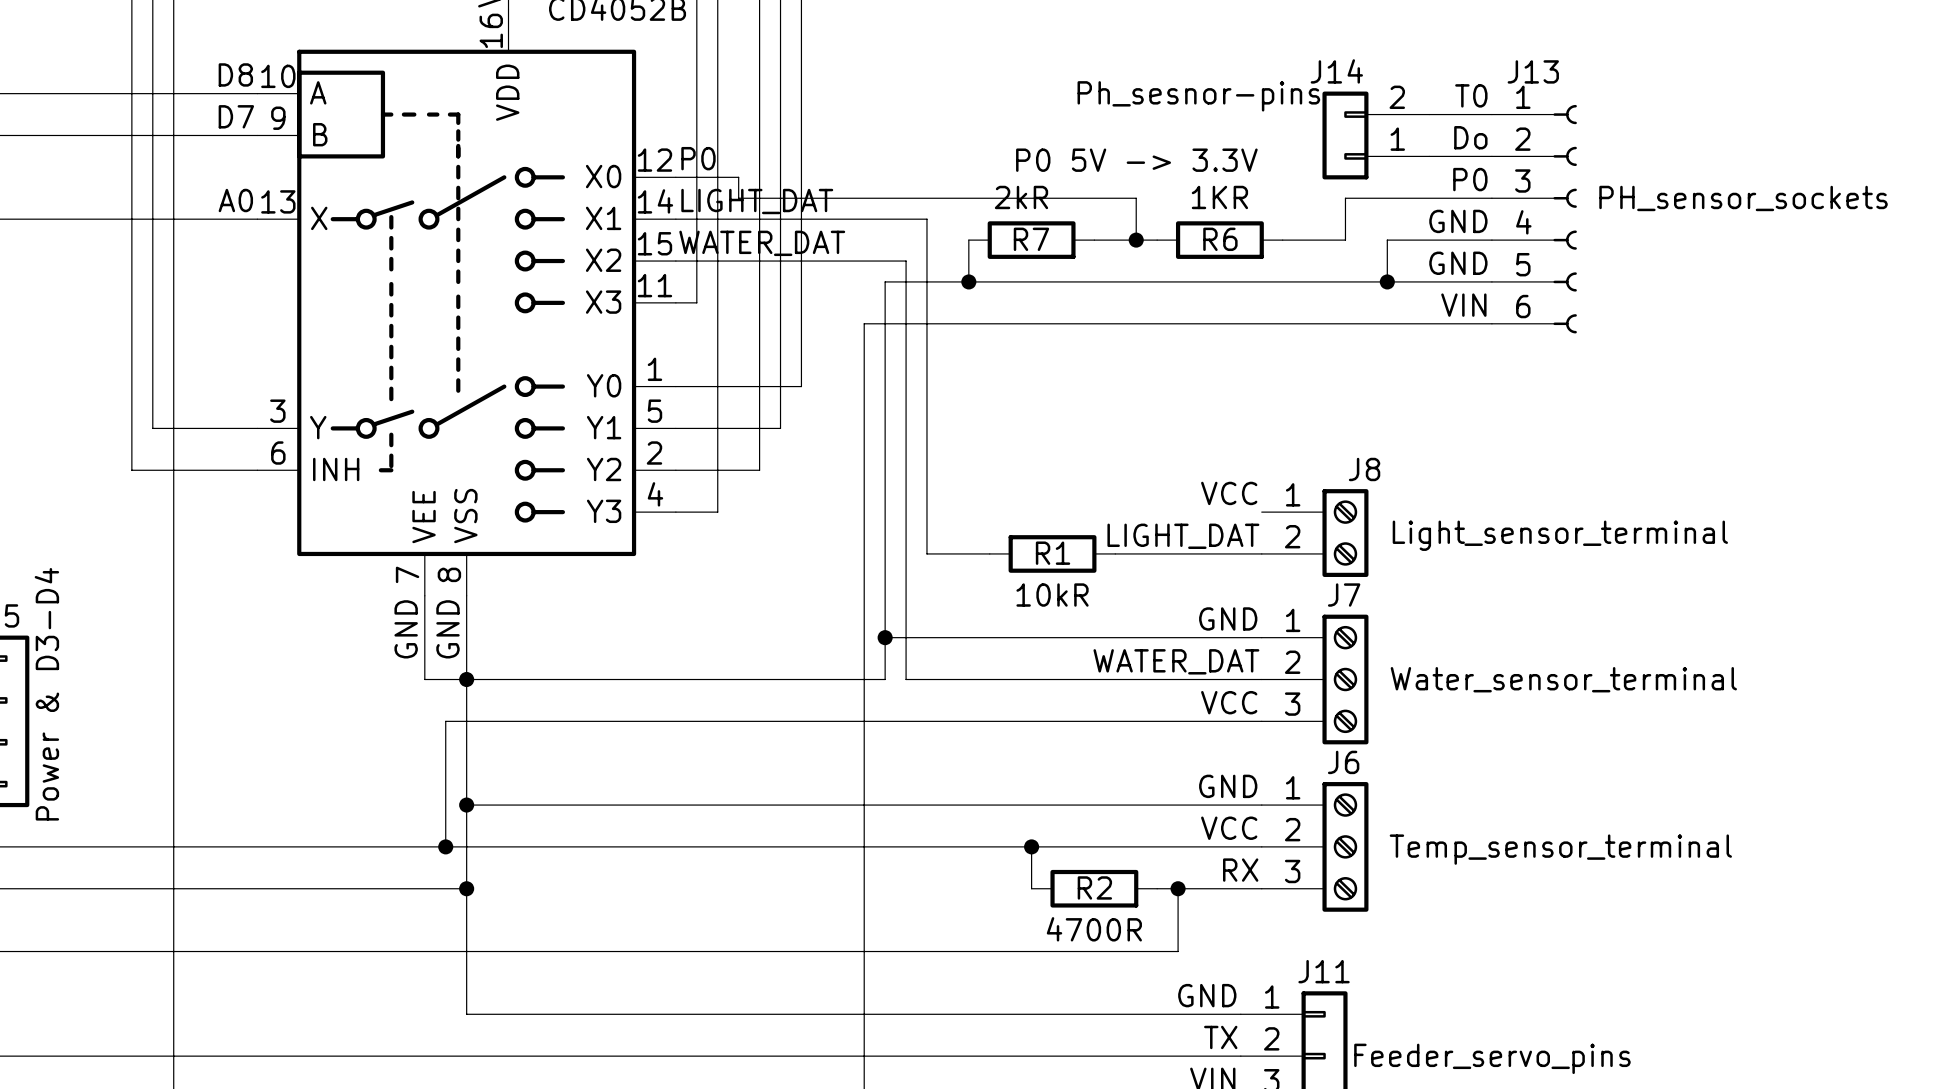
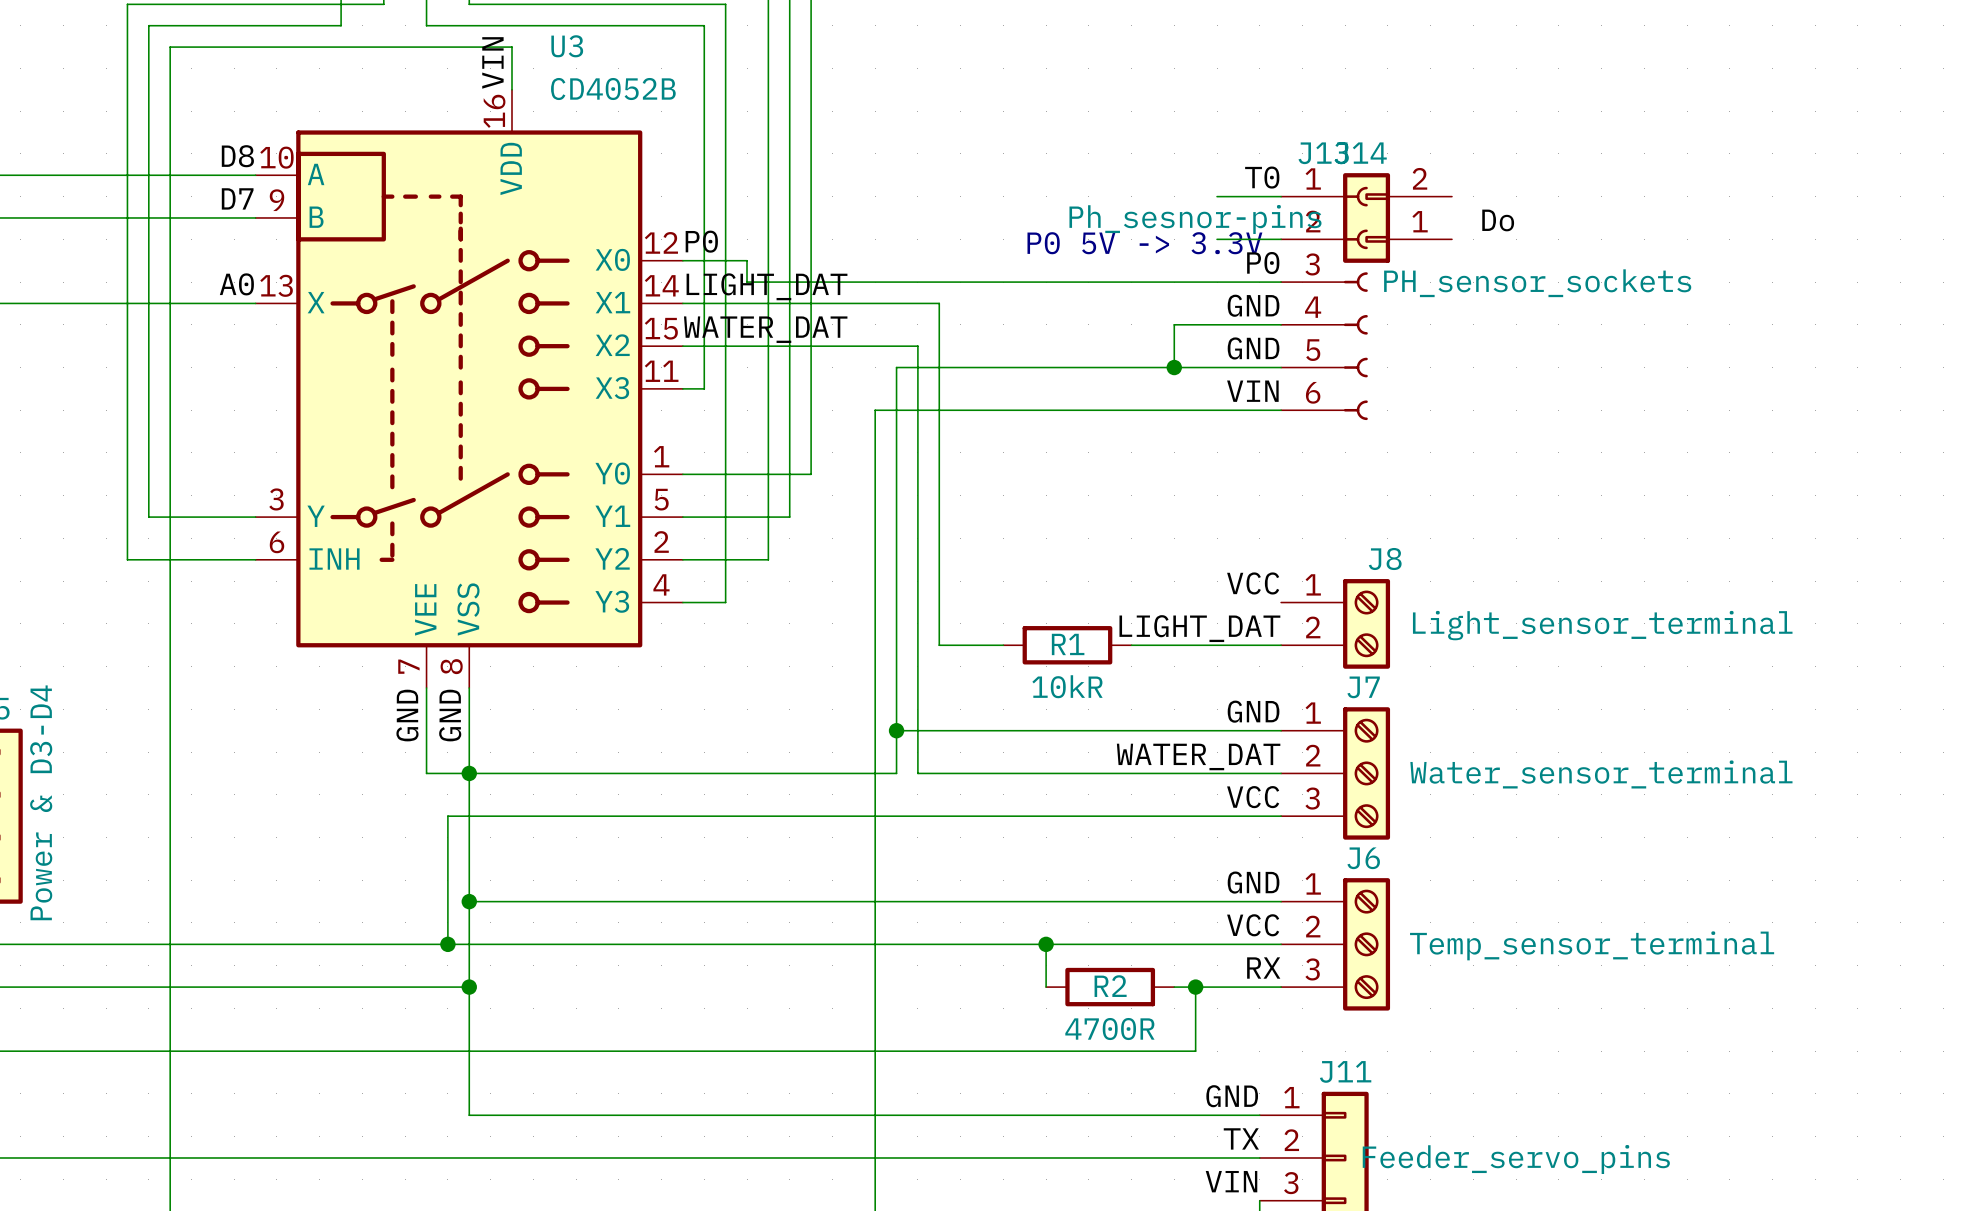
label position: T0 (1471, 95) -> T0 (1262, 177)
J14 value position: Ph_sesnor-pins (1198, 96) -> Ph_sesnor-pins (1195, 219)
wire: (1429, 114) (1491, 114) -> (1217, 196) (1281, 196)
wire: (1429, 156) (1491, 156) -> (1217, 239) (1281, 239)
label position: P0 (1470, 179) -> P0 (1263, 263)
wire: (1136, 198) (1136, 240) -> (1152, 282) (1281, 282)
wire: (1491, 198) (1345, 198) (1345, 240) (1282, 240) -> none
J13 position: (1534, 219) -> (1324, 303)
label: none -> GND (1253, 305)
label: GND (1458, 221) -> none
wire: (968, 240) (968, 281) -> none
R7: 2kR (1031, 240) -> none
wire: (1094, 240) (1157, 240) -> none
junction position: (1136, 240) -> (1174, 367)
R6: 1KR (1219, 240) -> none
wire: (1491, 240) (1387, 240) (1387, 281) -> (1281, 324) (1174, 324) (1174, 367)
label: none -> GND (1253, 348)
label: GND (1458, 263) -> none
junction: (968, 281) -> none
wire: (1261, 281) (1491, 281) -> none
junction: (1387, 281) -> none
label position: VIN (1463, 305) -> VIN (1252, 391)
wire: (1261, 323) (1491, 323) -> none

